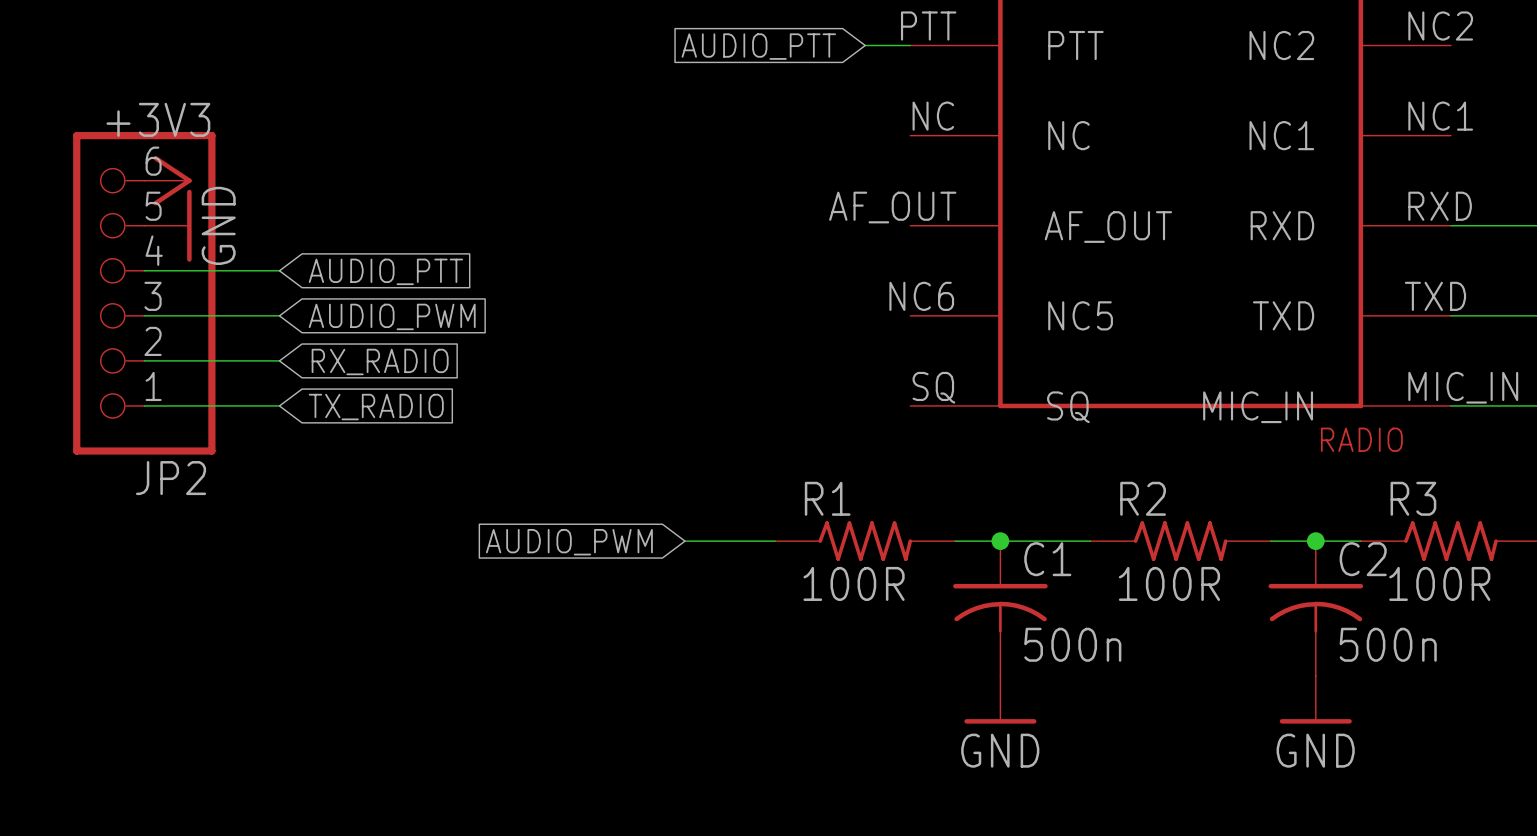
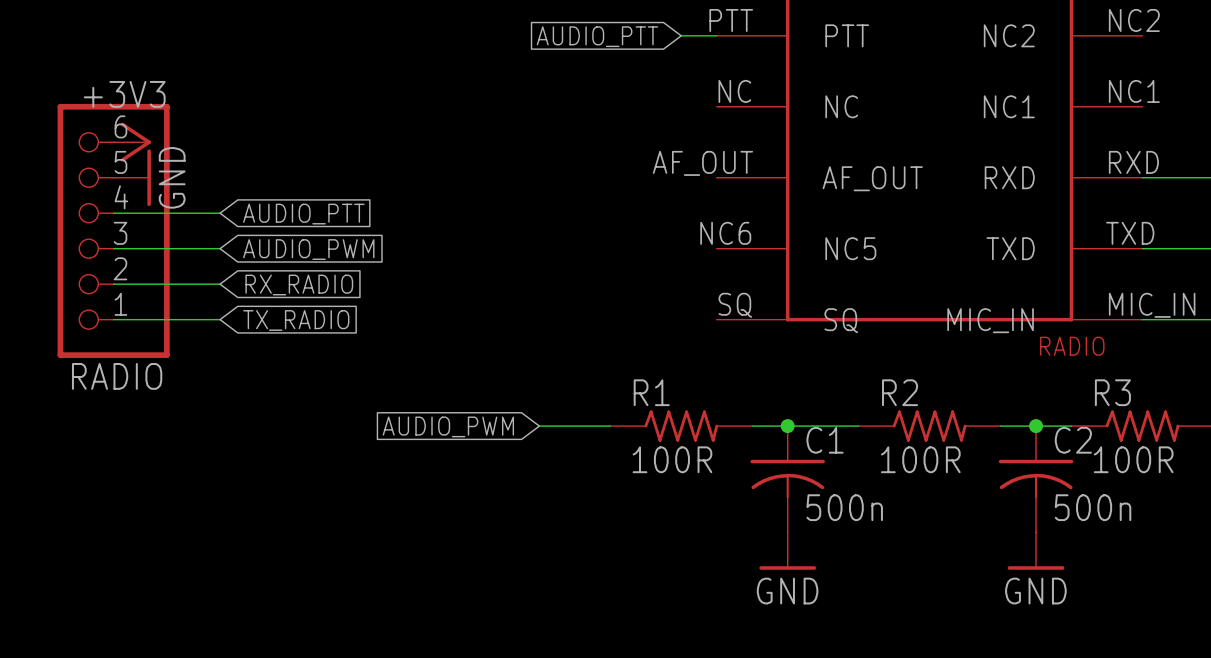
JP2 name: JP2 (171, 478) -> RADIO (117, 376)

